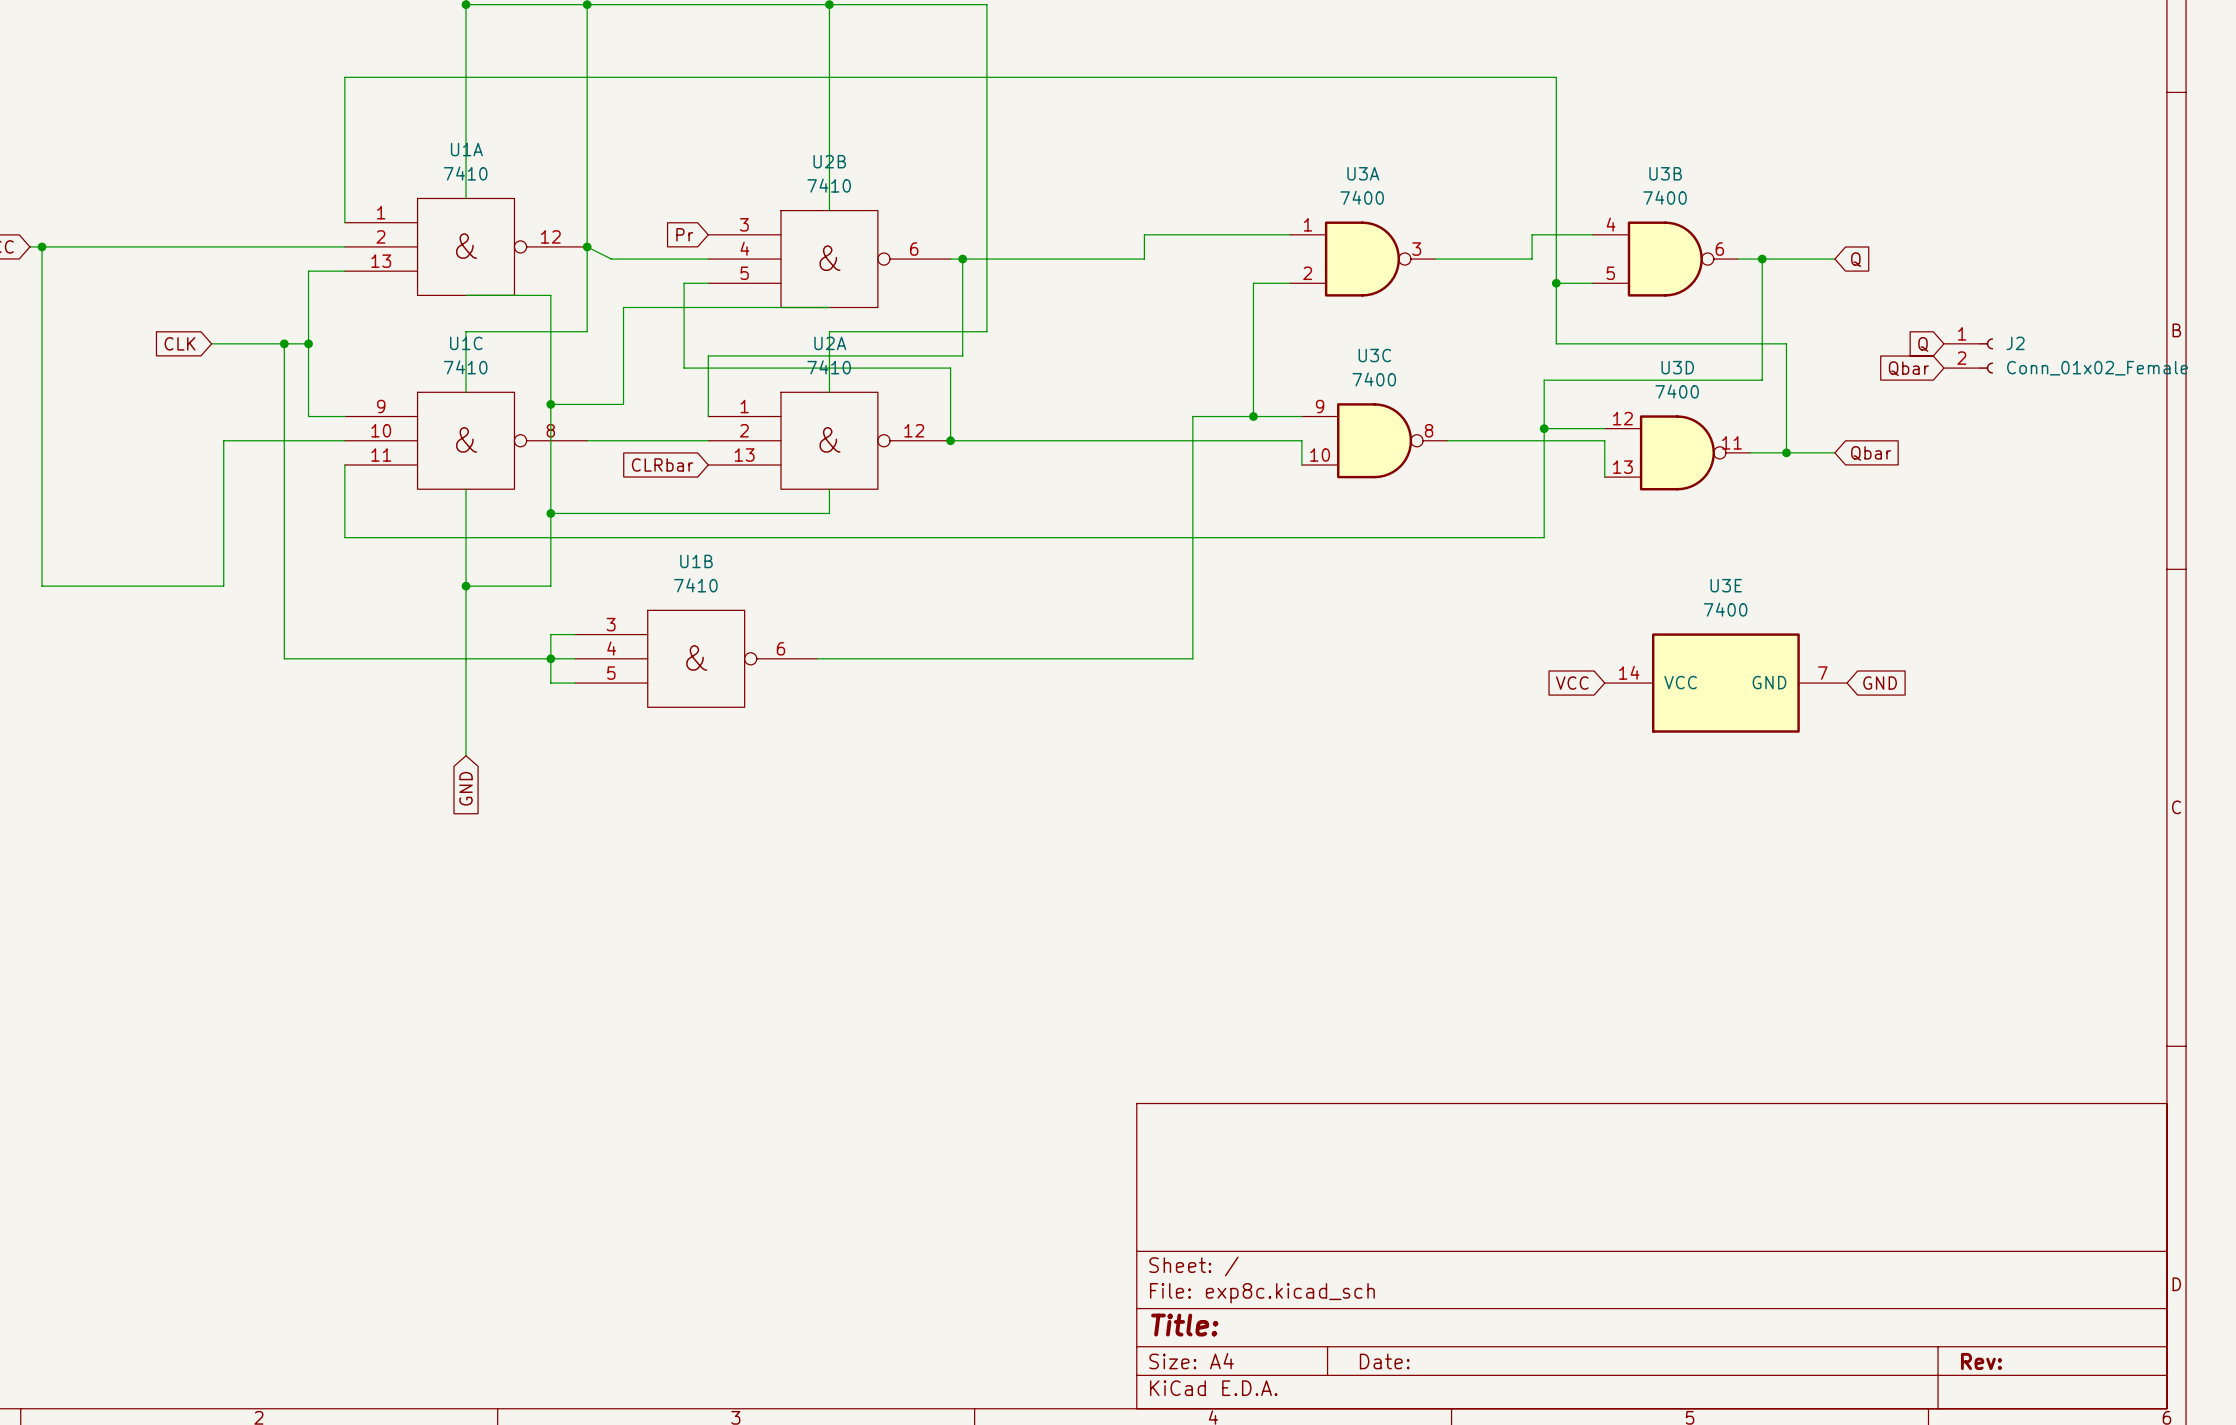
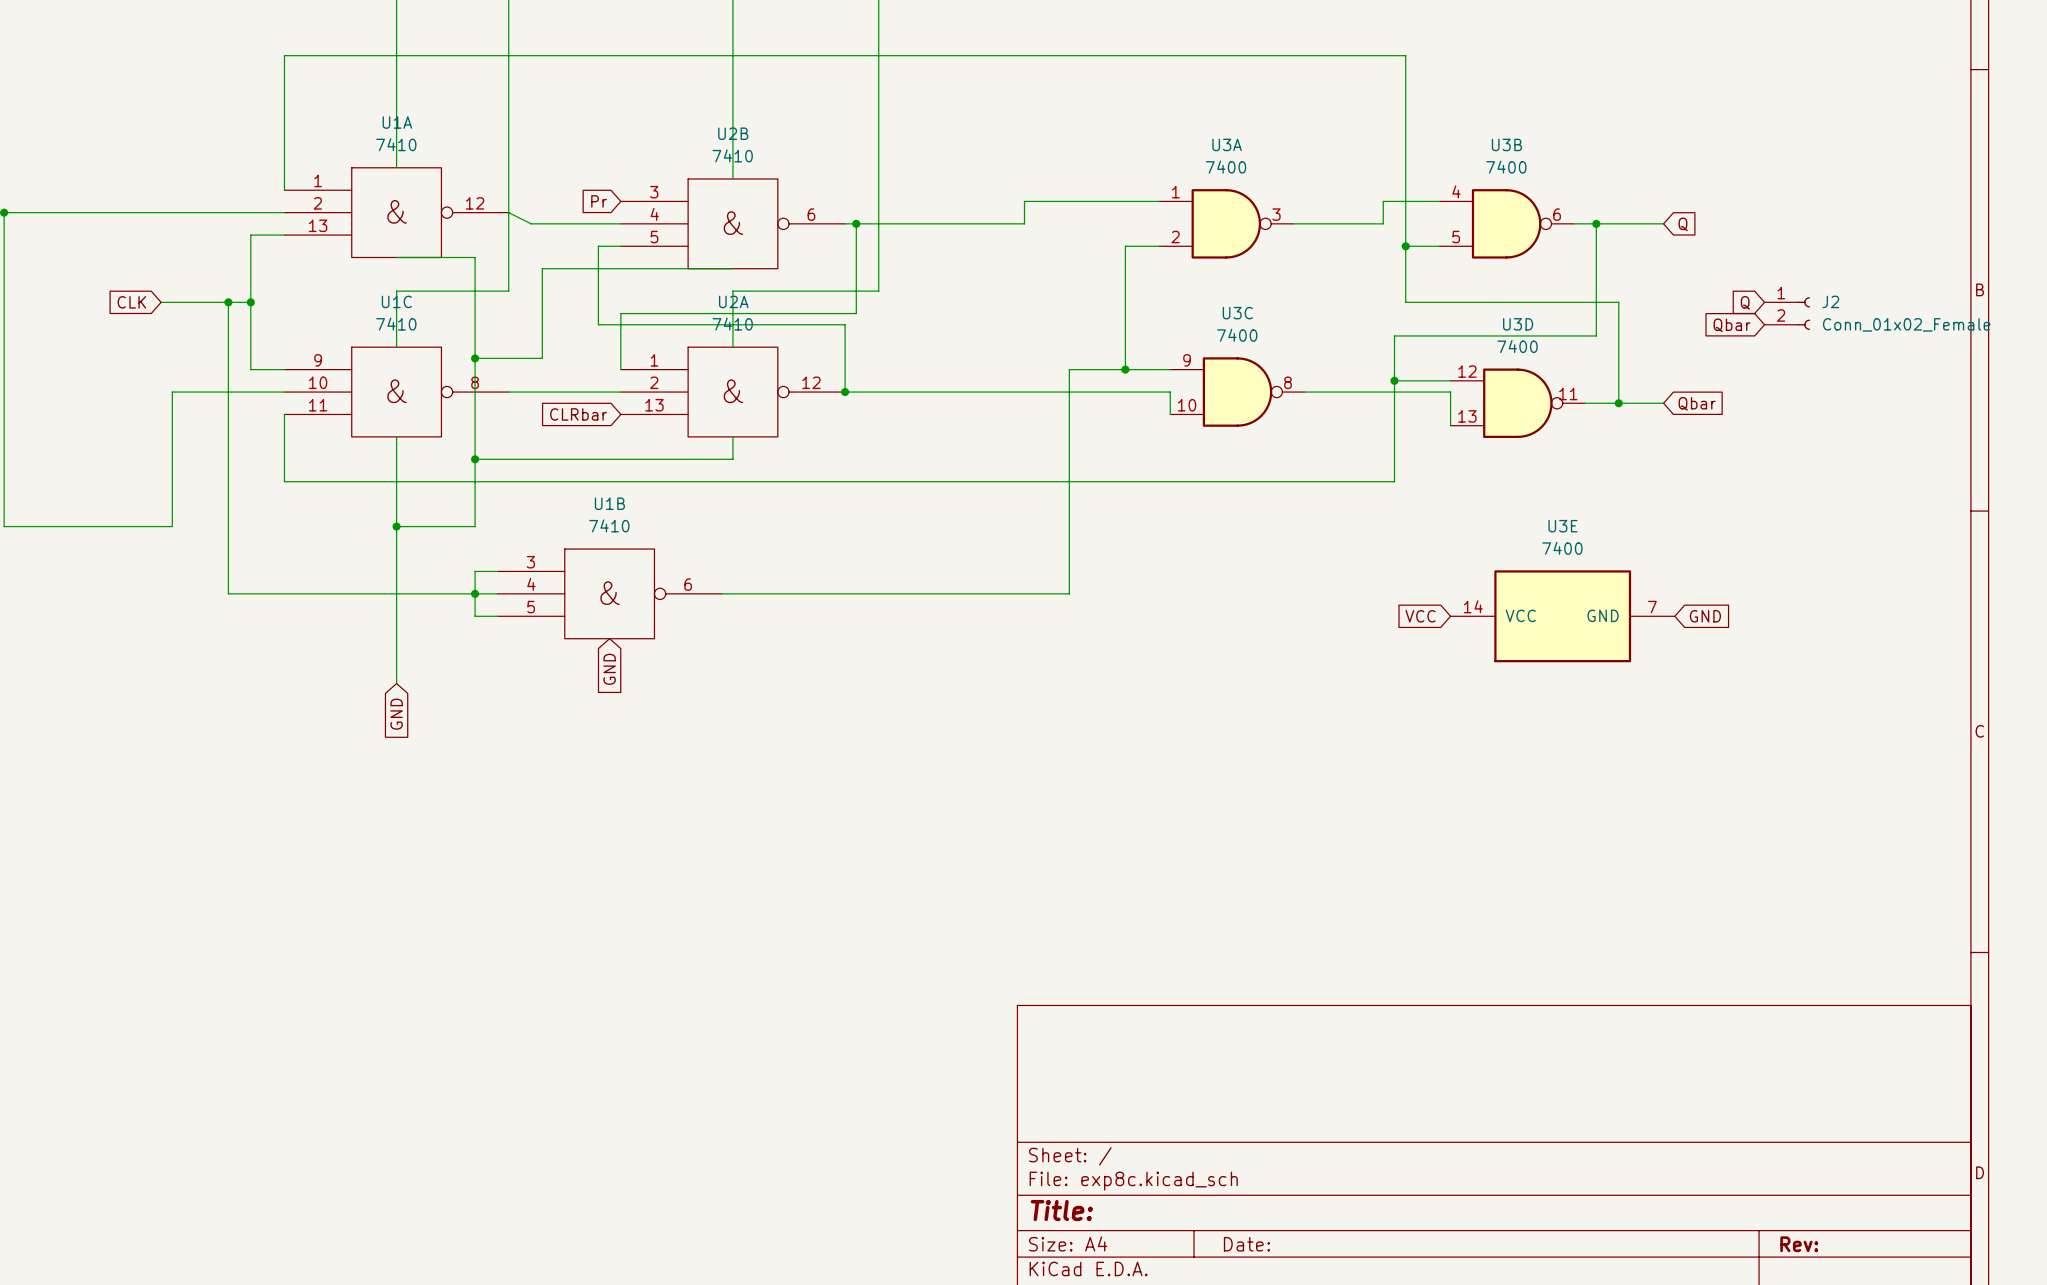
junction: (587, 246) -> none
global label: none -> GND (609, 669)

